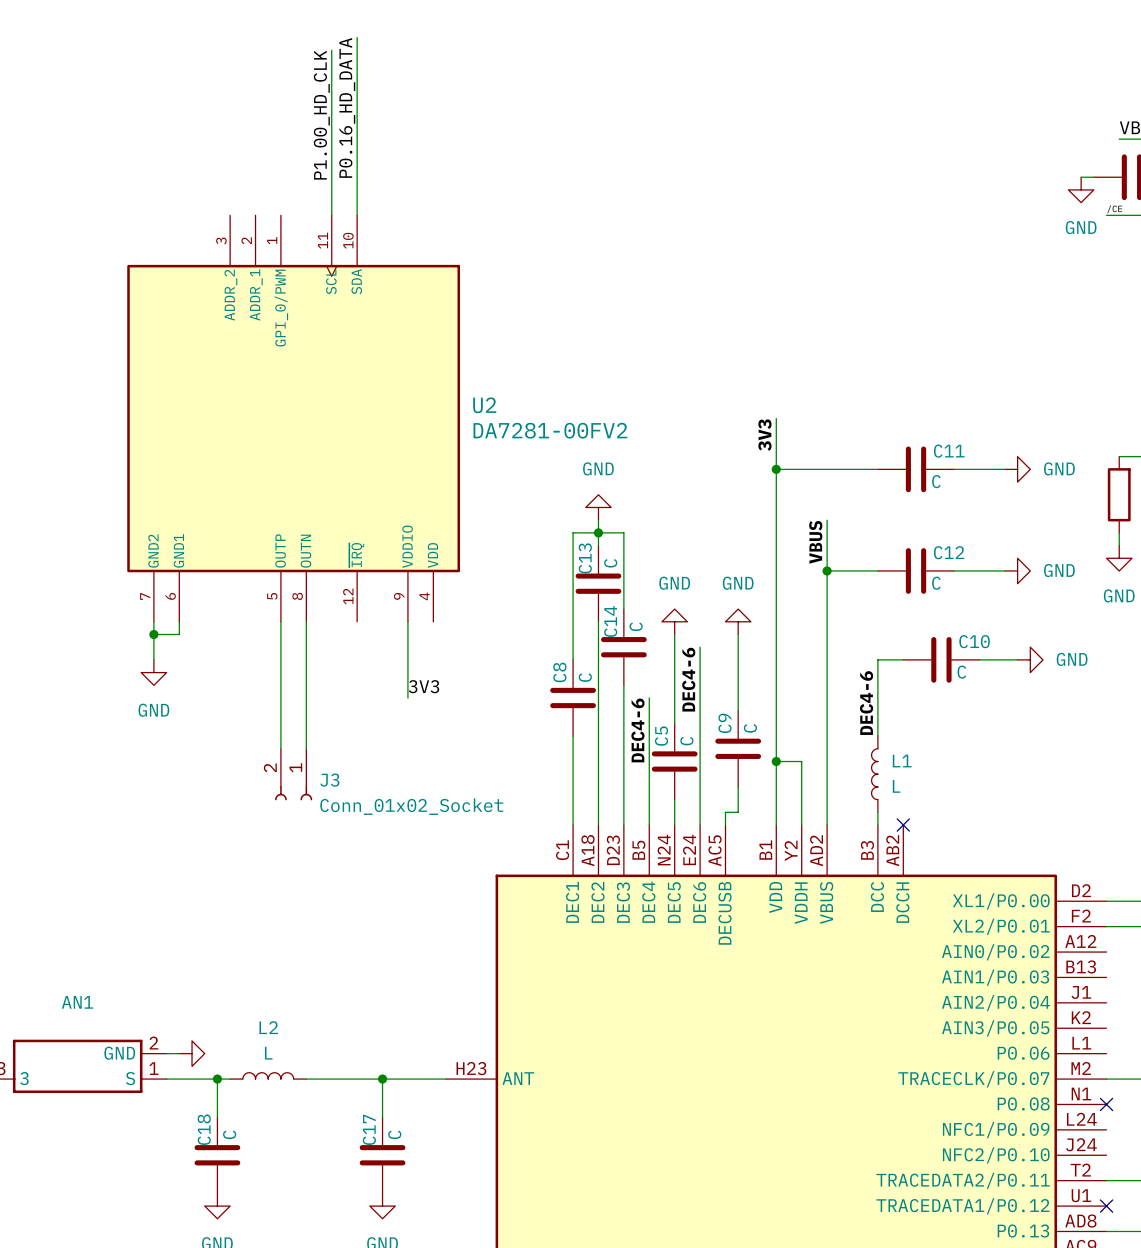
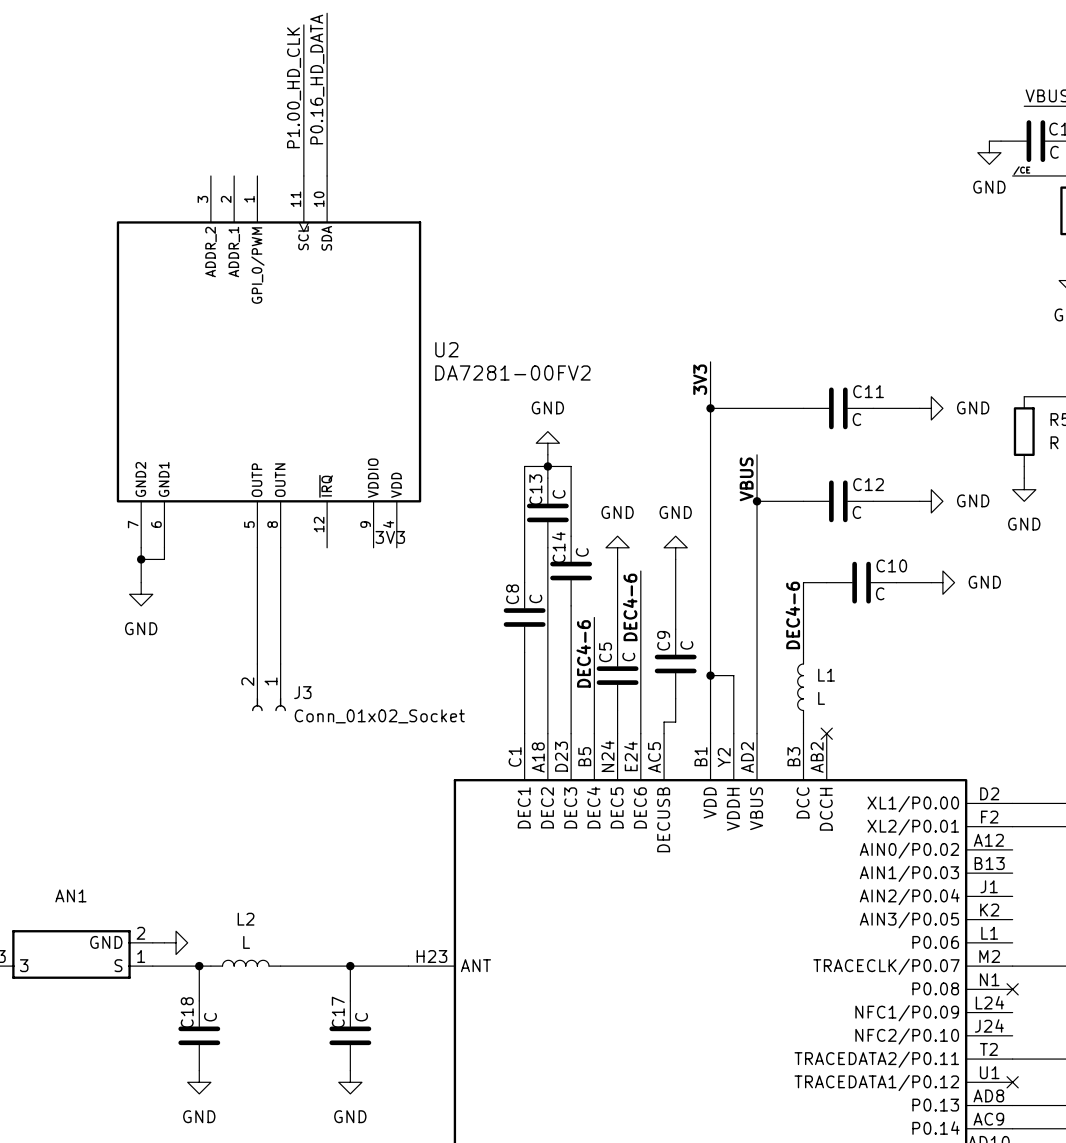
wire: (407, 621) (407, 698) -> none
label position: 3V3 (424, 686) -> 3V3 (390, 537)

